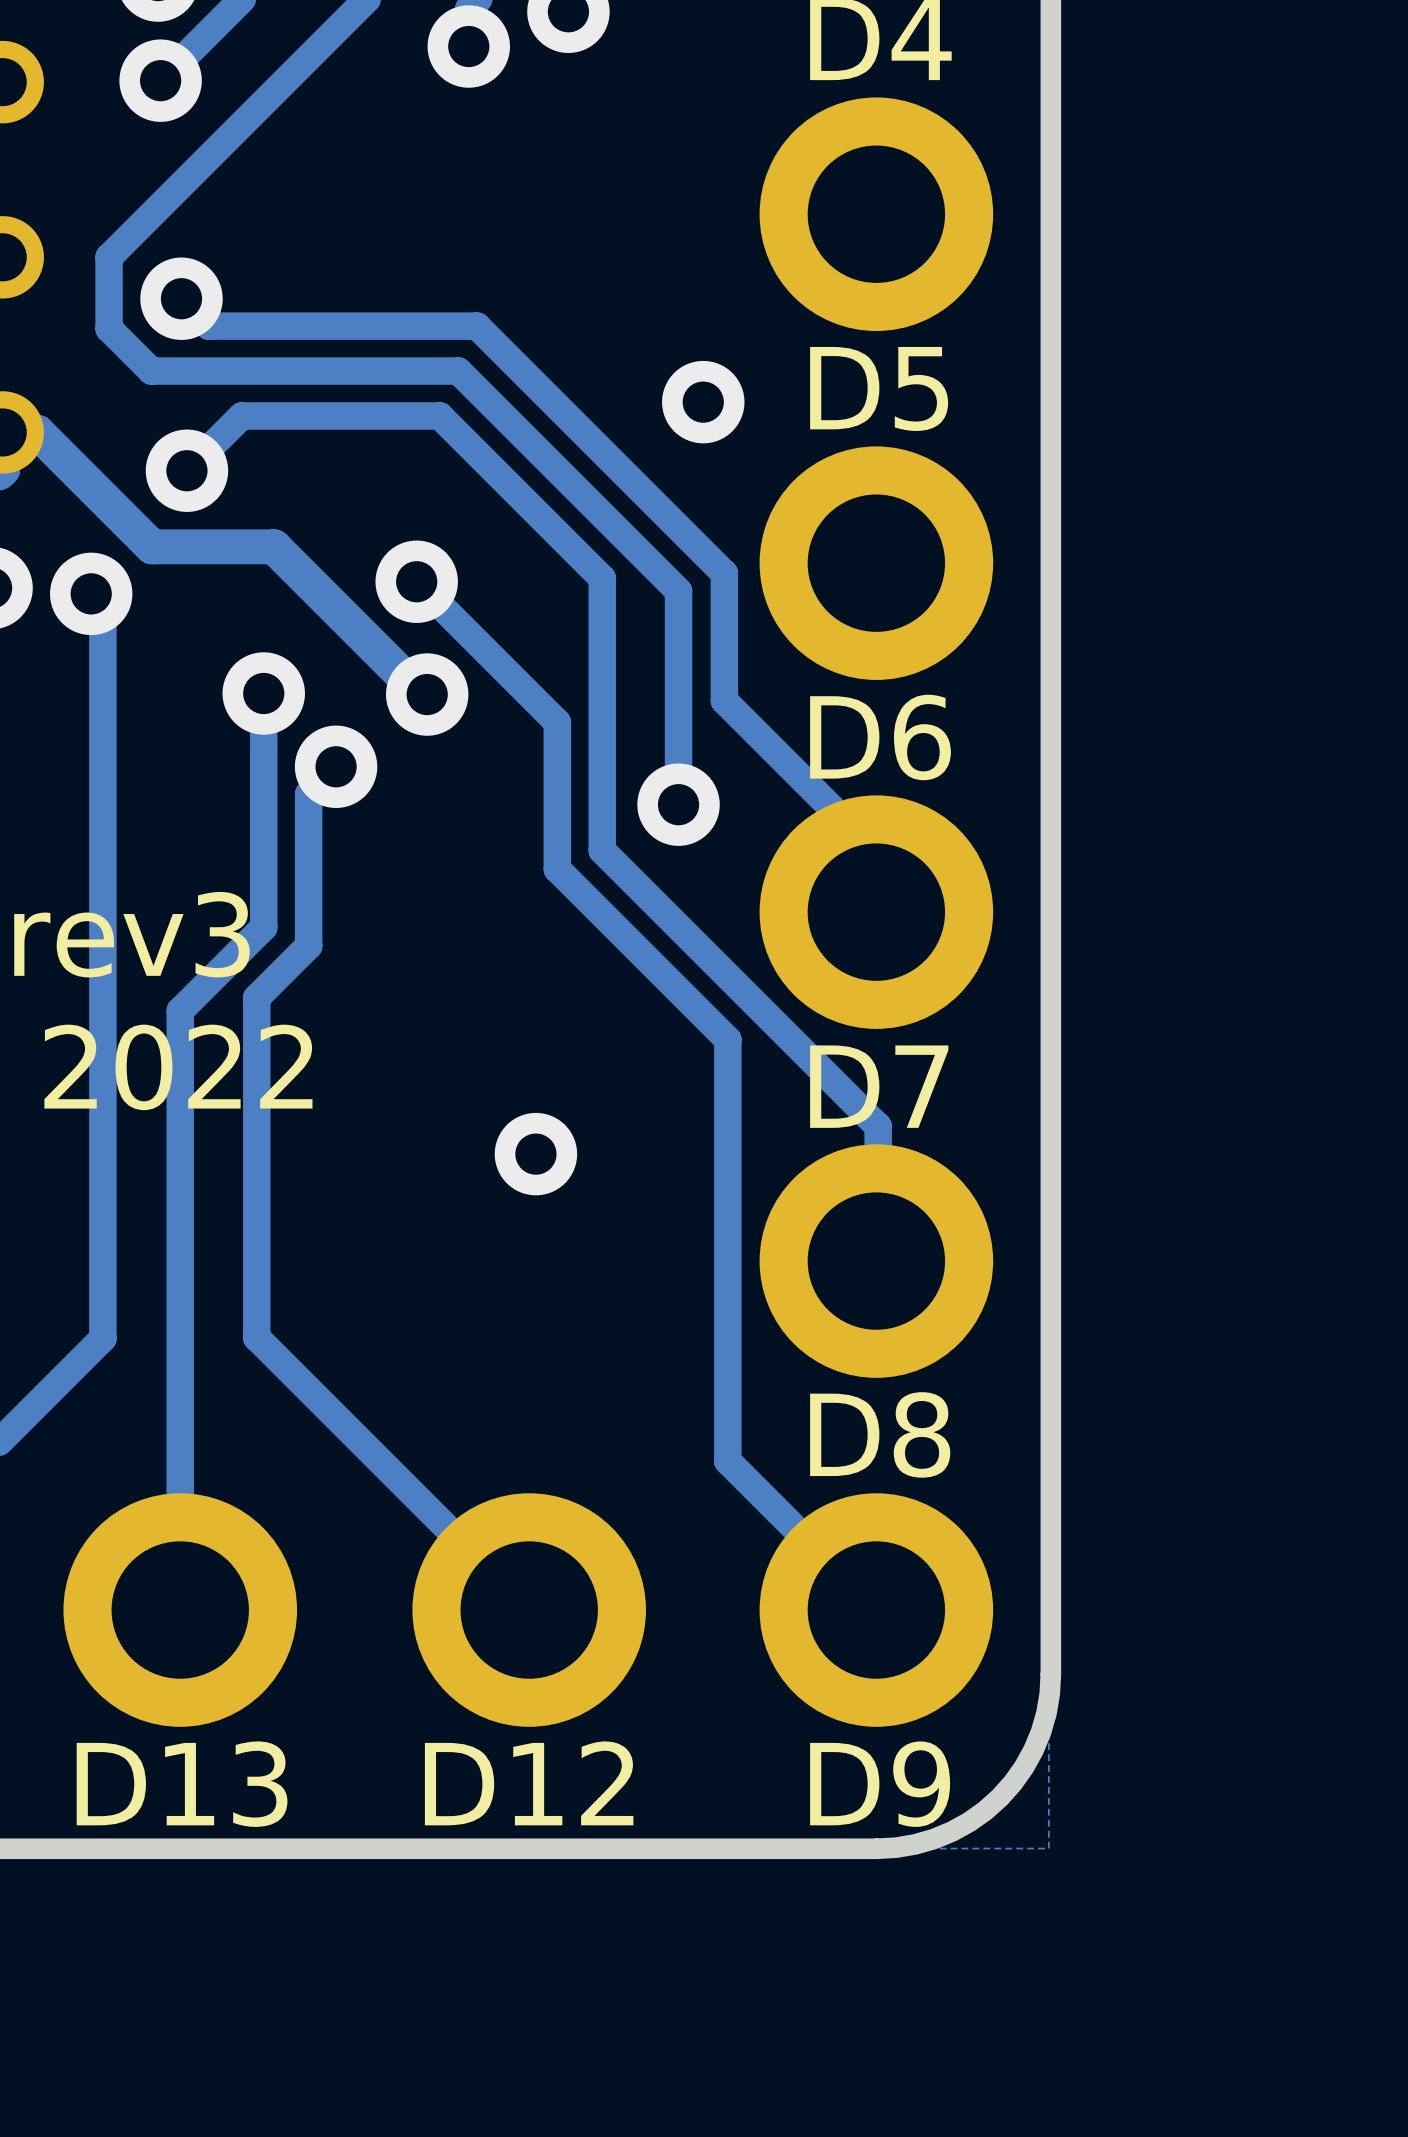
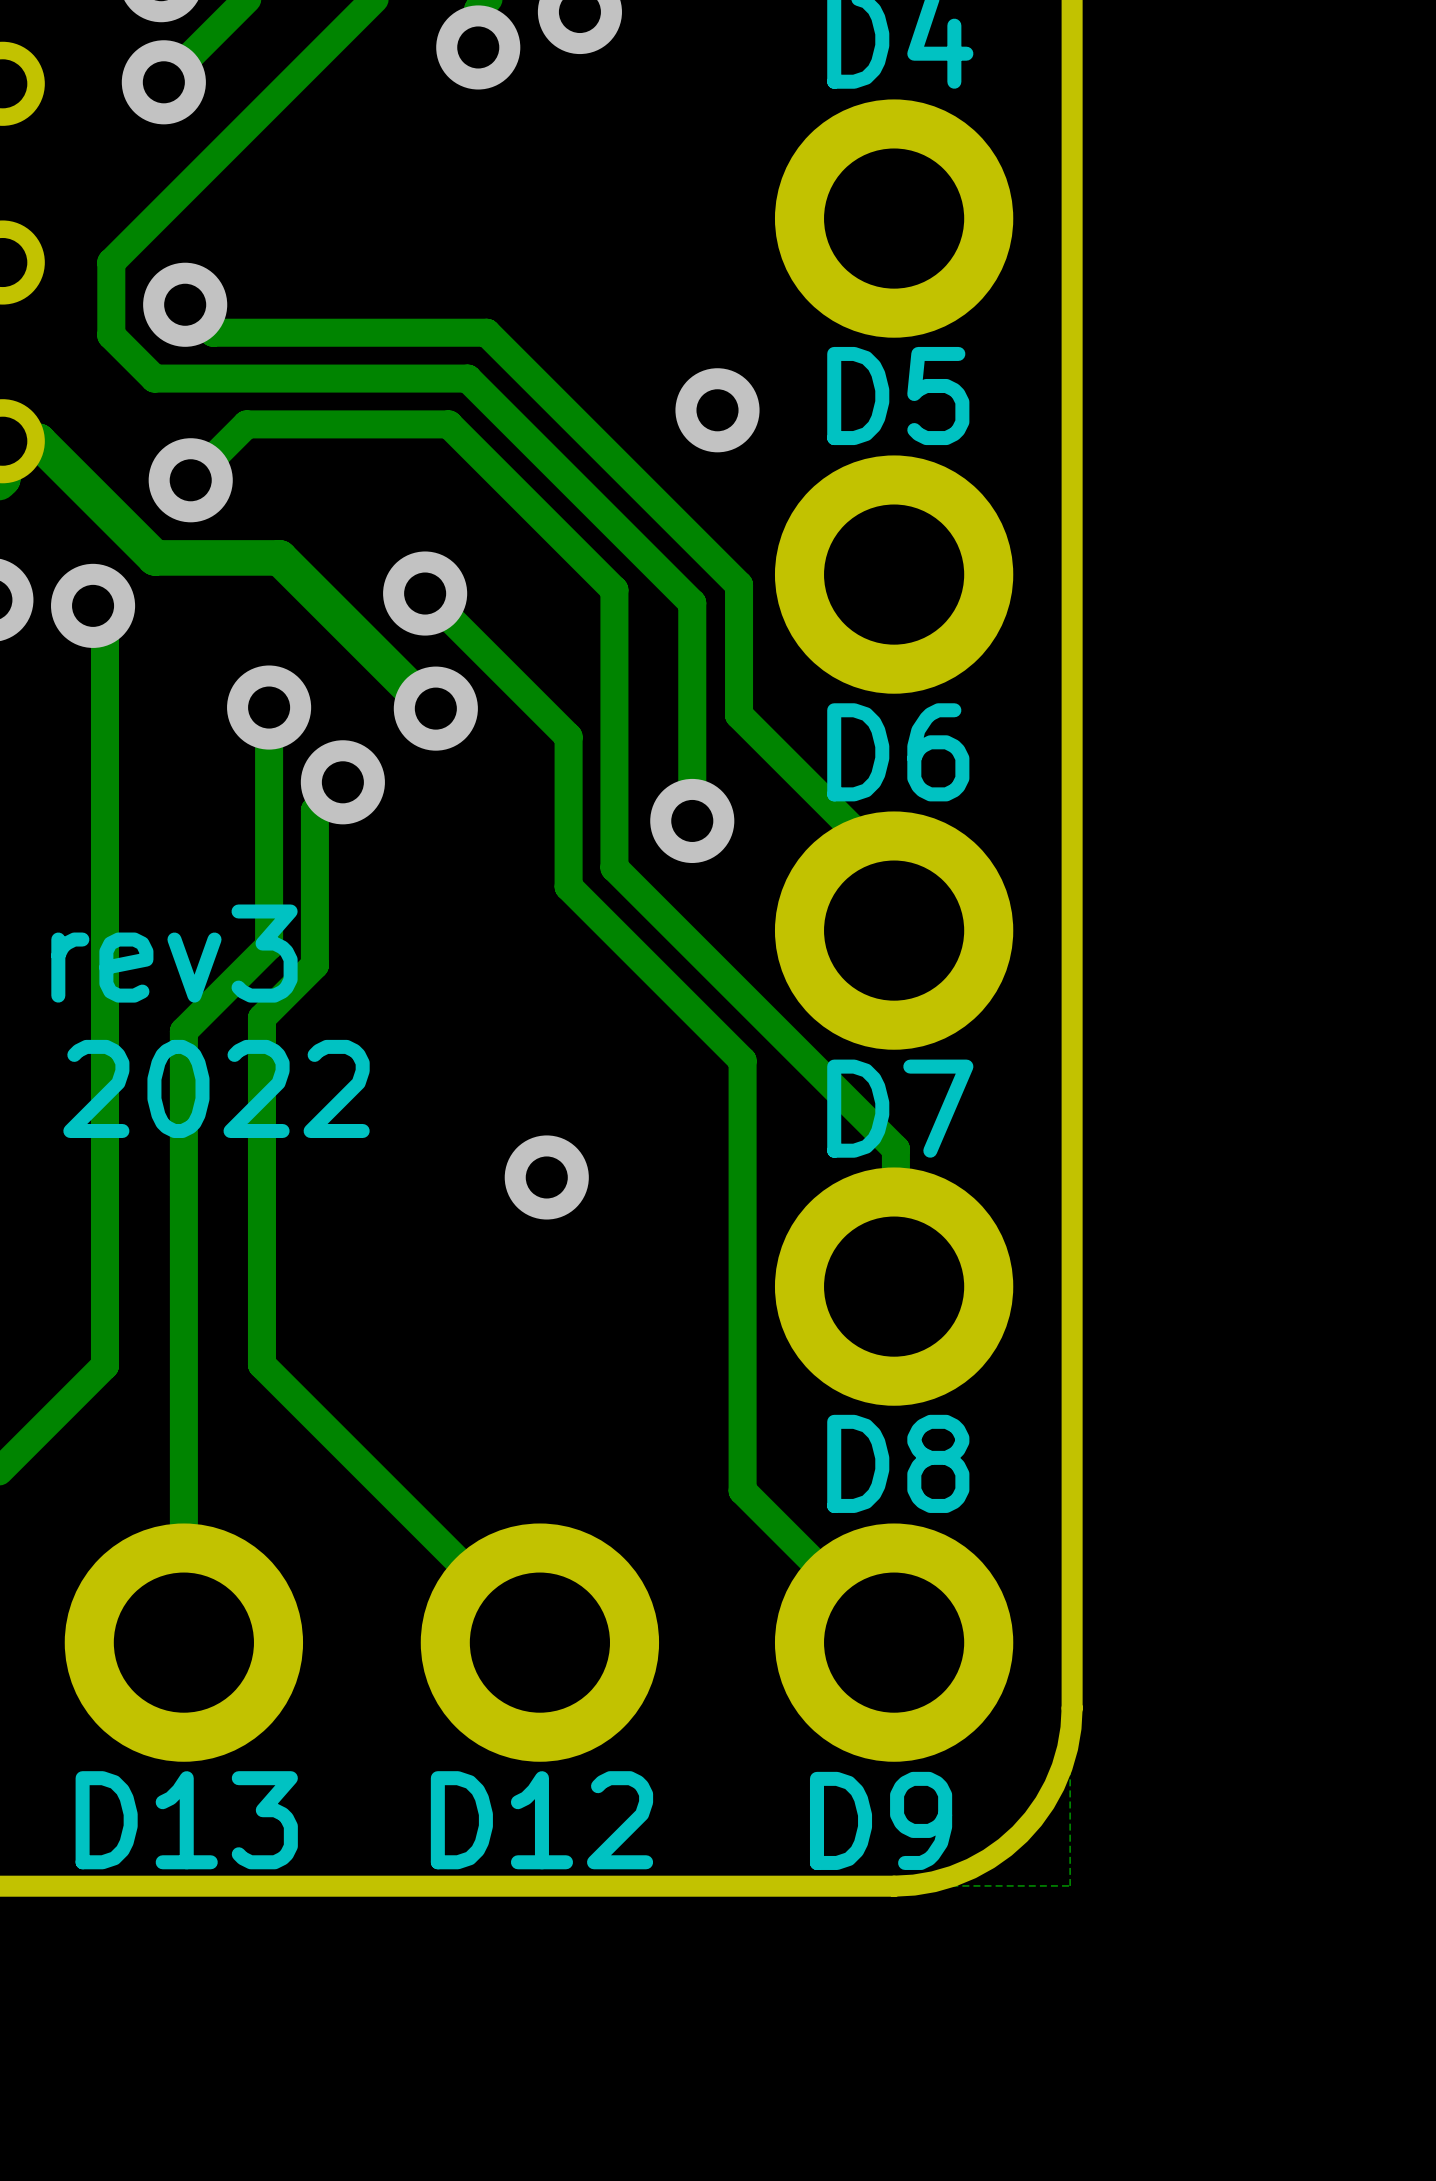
text position: D9 (880, 1784) -> D9 (881, 1820)

